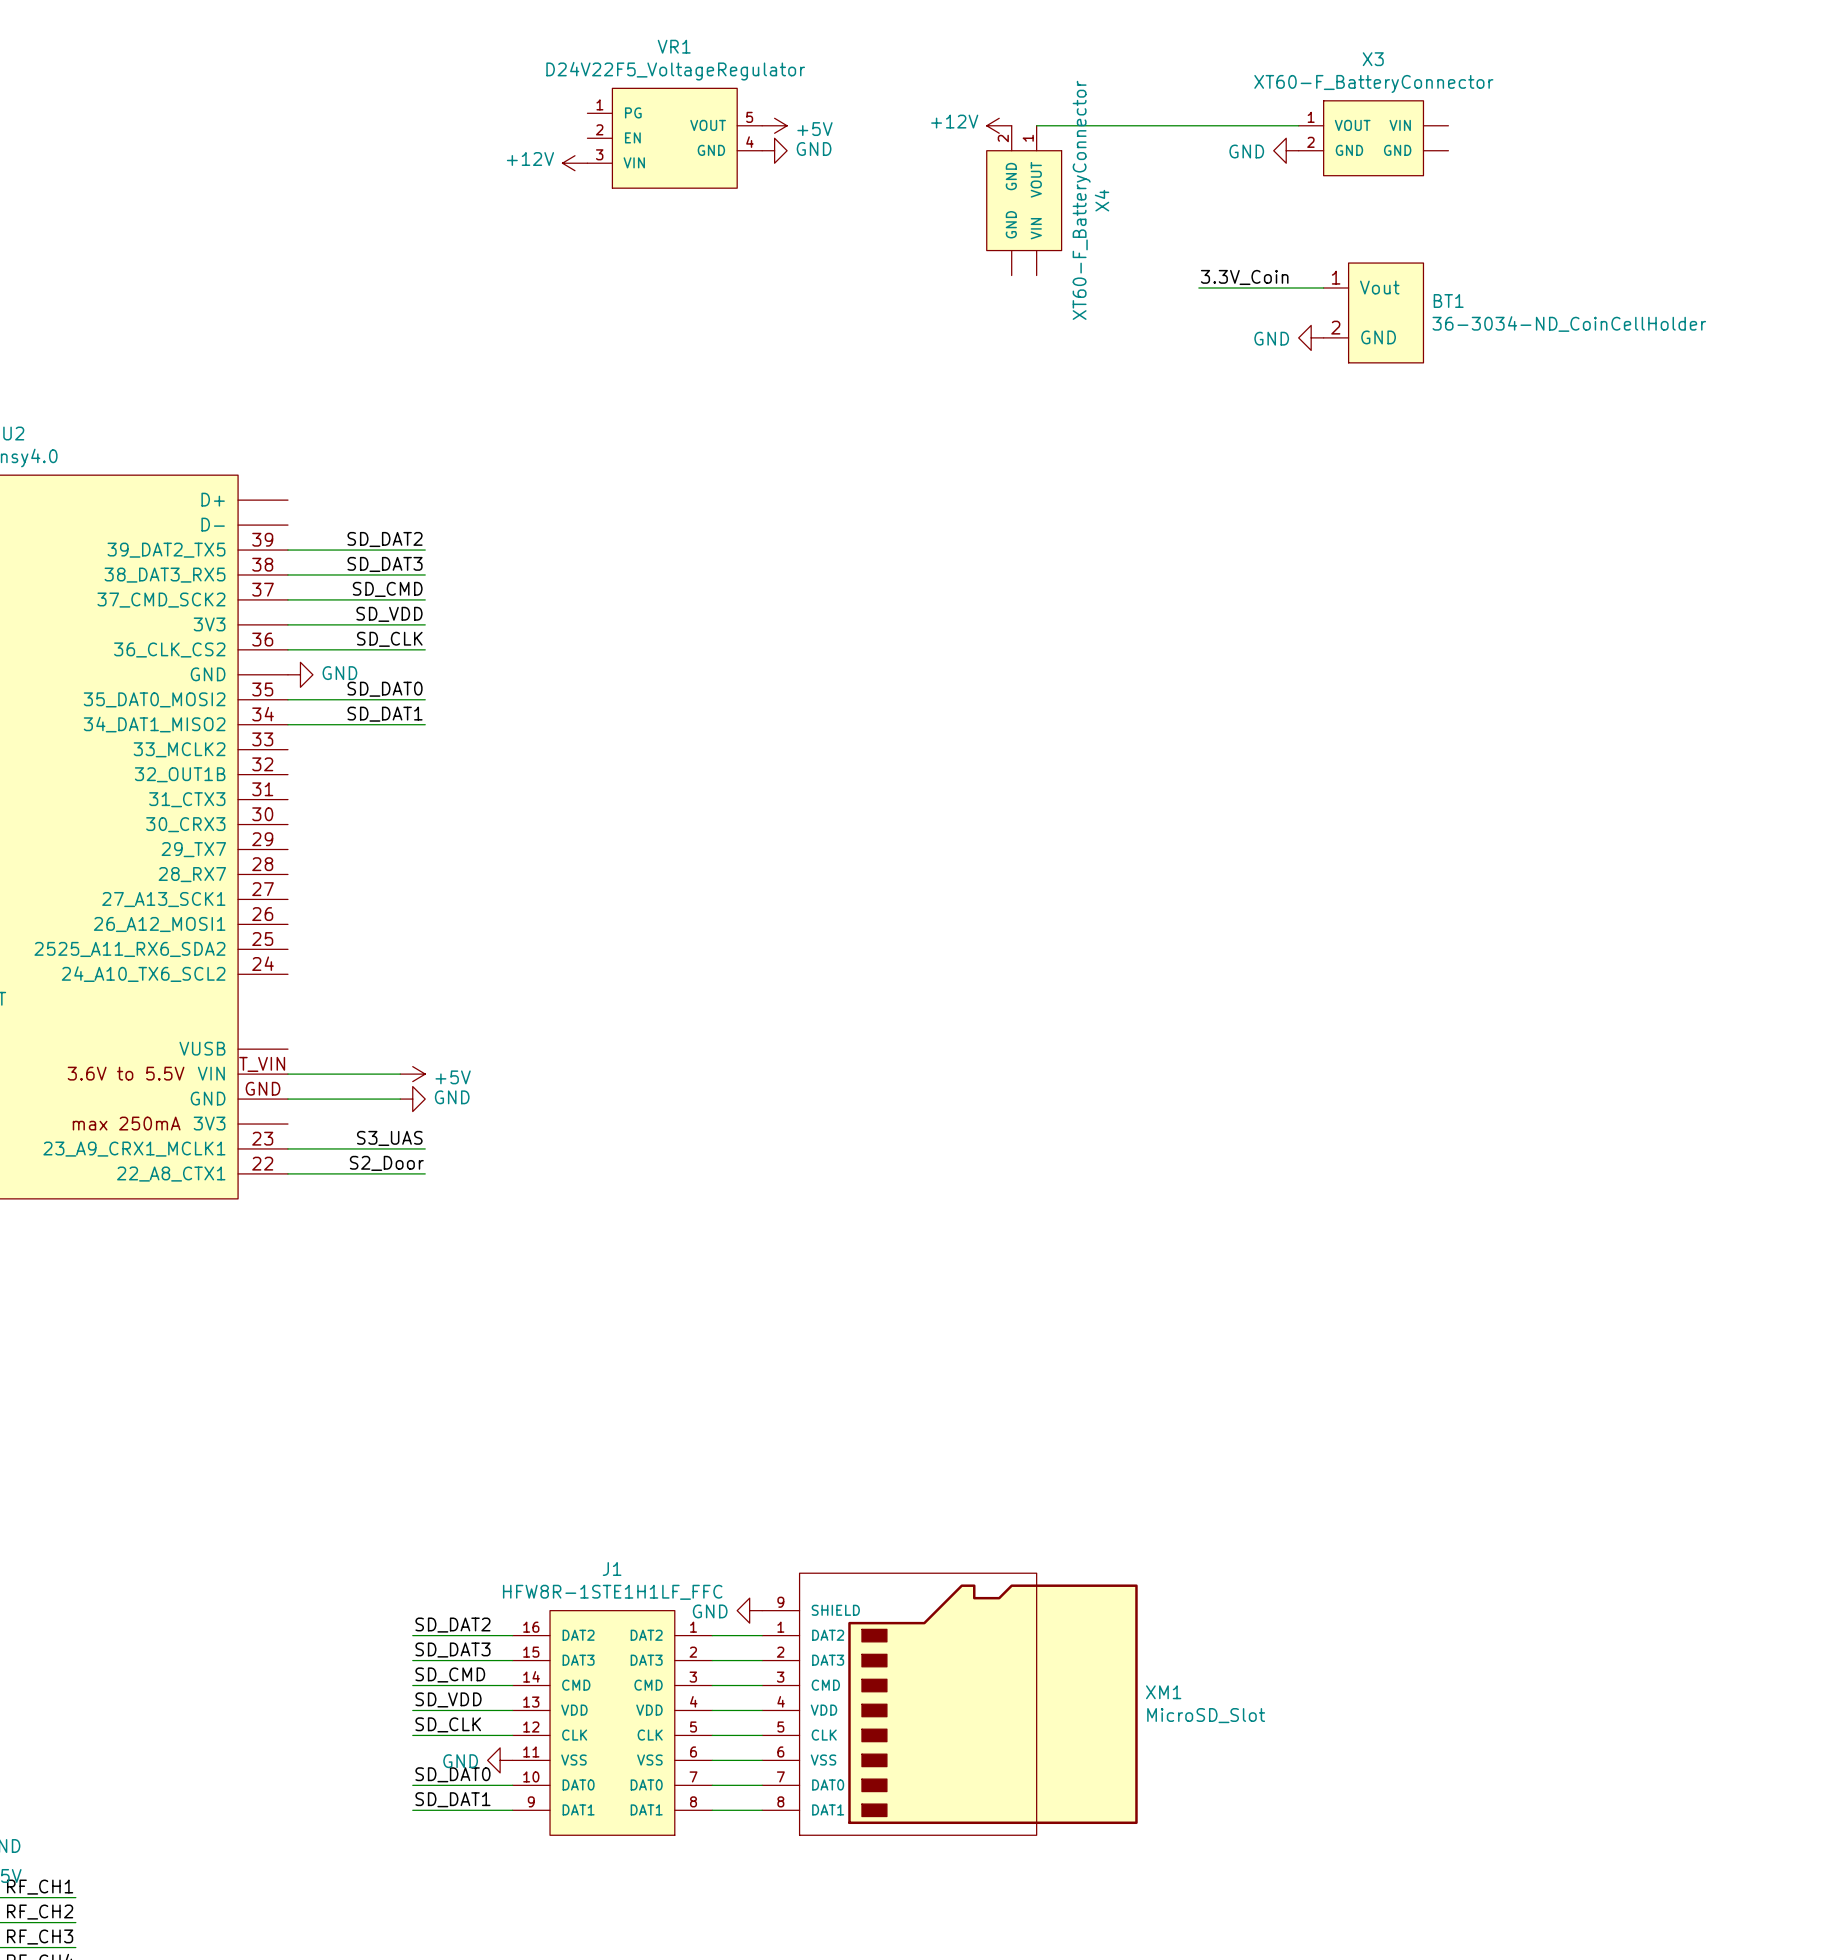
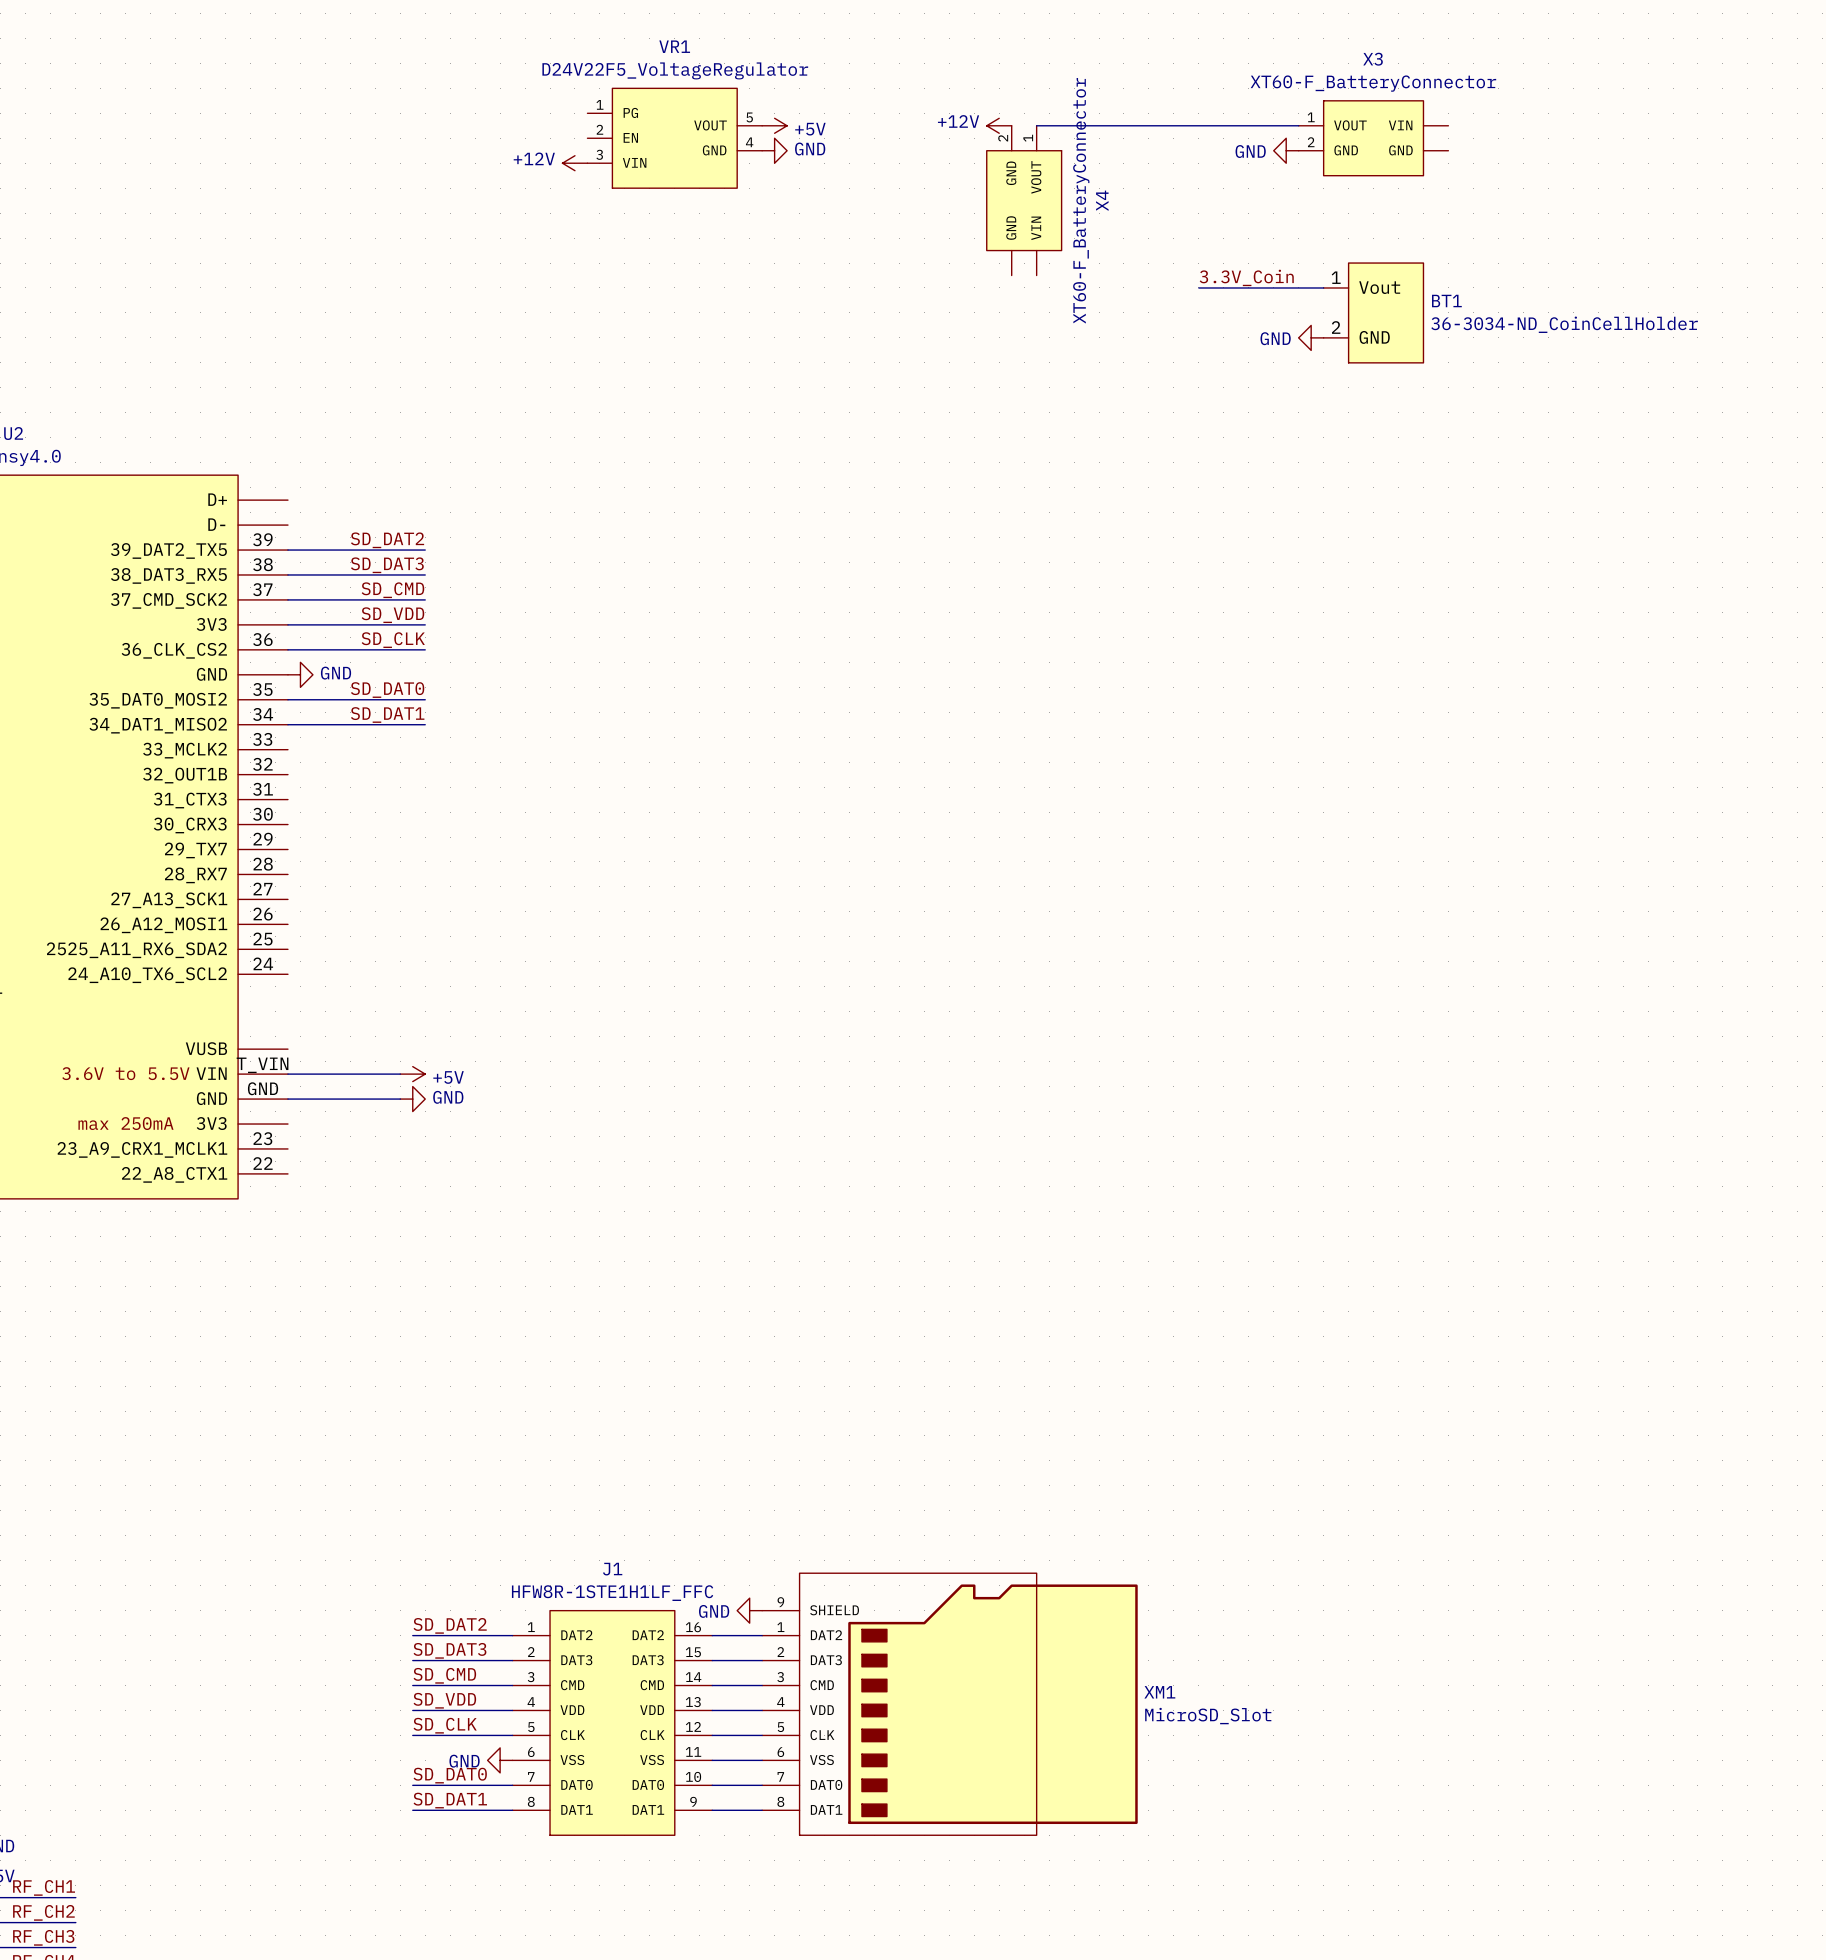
label: S3_UAS (389, 1138) -> none
wire: (287, 1148) (425, 1148) -> none
label: S2_Door (386, 1163) -> none
wire: (287, 1173) (425, 1173) -> none
J1 flip: as is (612, 1722) -> left-right (612, 1722)

